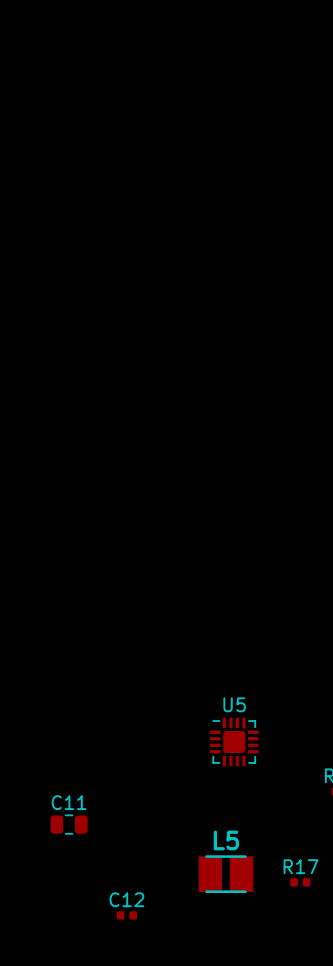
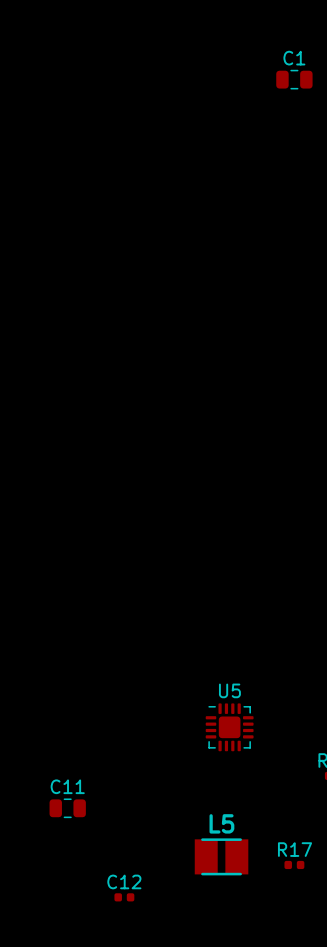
C1: none -> (294, 79)

